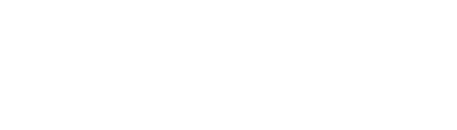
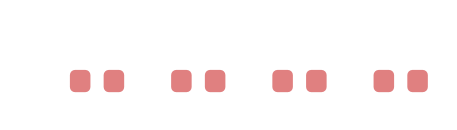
part: none -> (97, 81)
part: none -> (198, 81)
part: none -> (299, 81)
part: none -> (400, 81)

